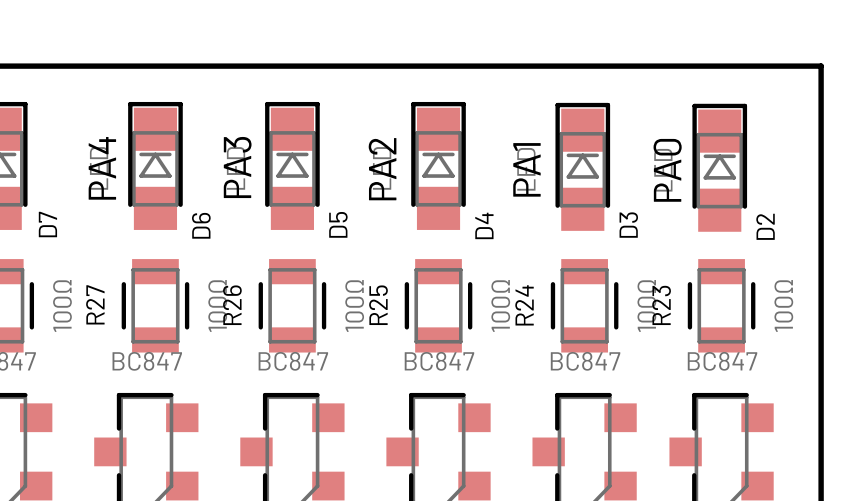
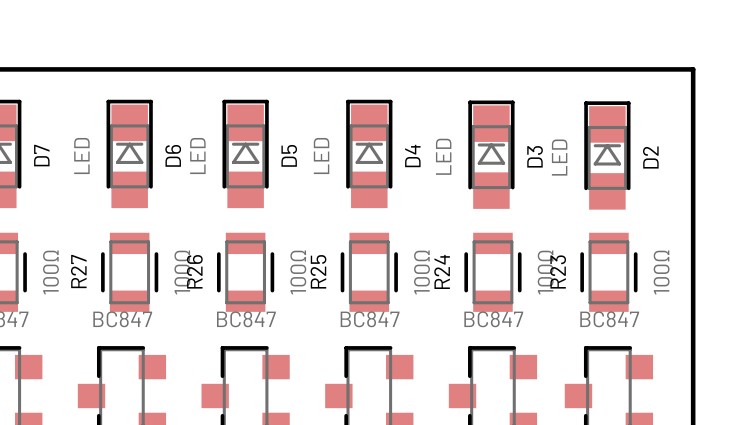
text: PA3 (237, 167) -> none
text: PA4 (102, 168) -> none
text: PA2 (382, 169) -> none
text: PA1 (526, 169) -> none
text: PA0 (667, 170) -> none
D7 name position: D7 (47, 224) -> D7 (41, 155)
D5 name position: D5 (338, 224) -> D5 (289, 155)
D6 name position: D6 (201, 225) -> D6 (173, 155)
D4 name position: D4 (484, 225) -> D4 (412, 156)
D3 name position: D3 (628, 225) -> D3 (535, 156)
D2 name position: D2 (765, 226) -> D2 (650, 157)

